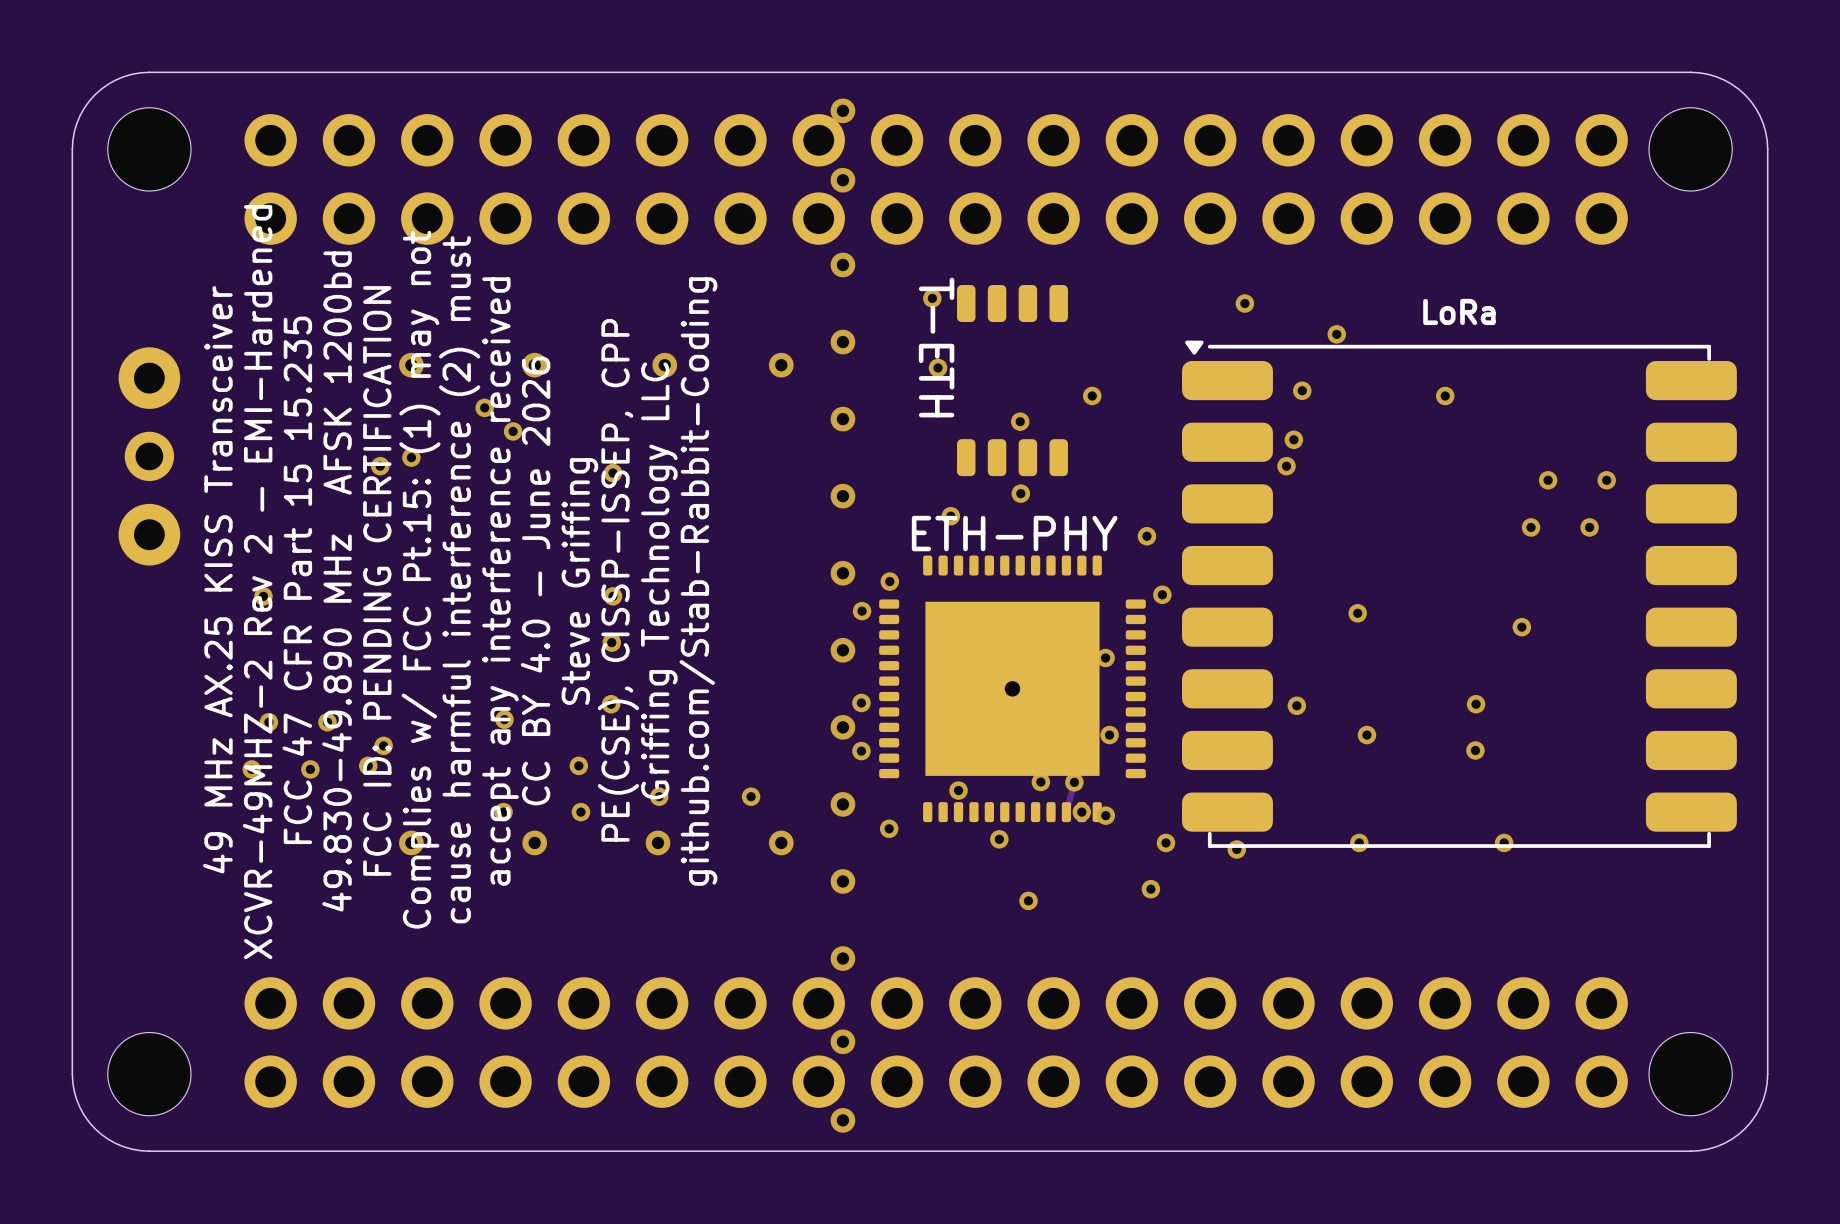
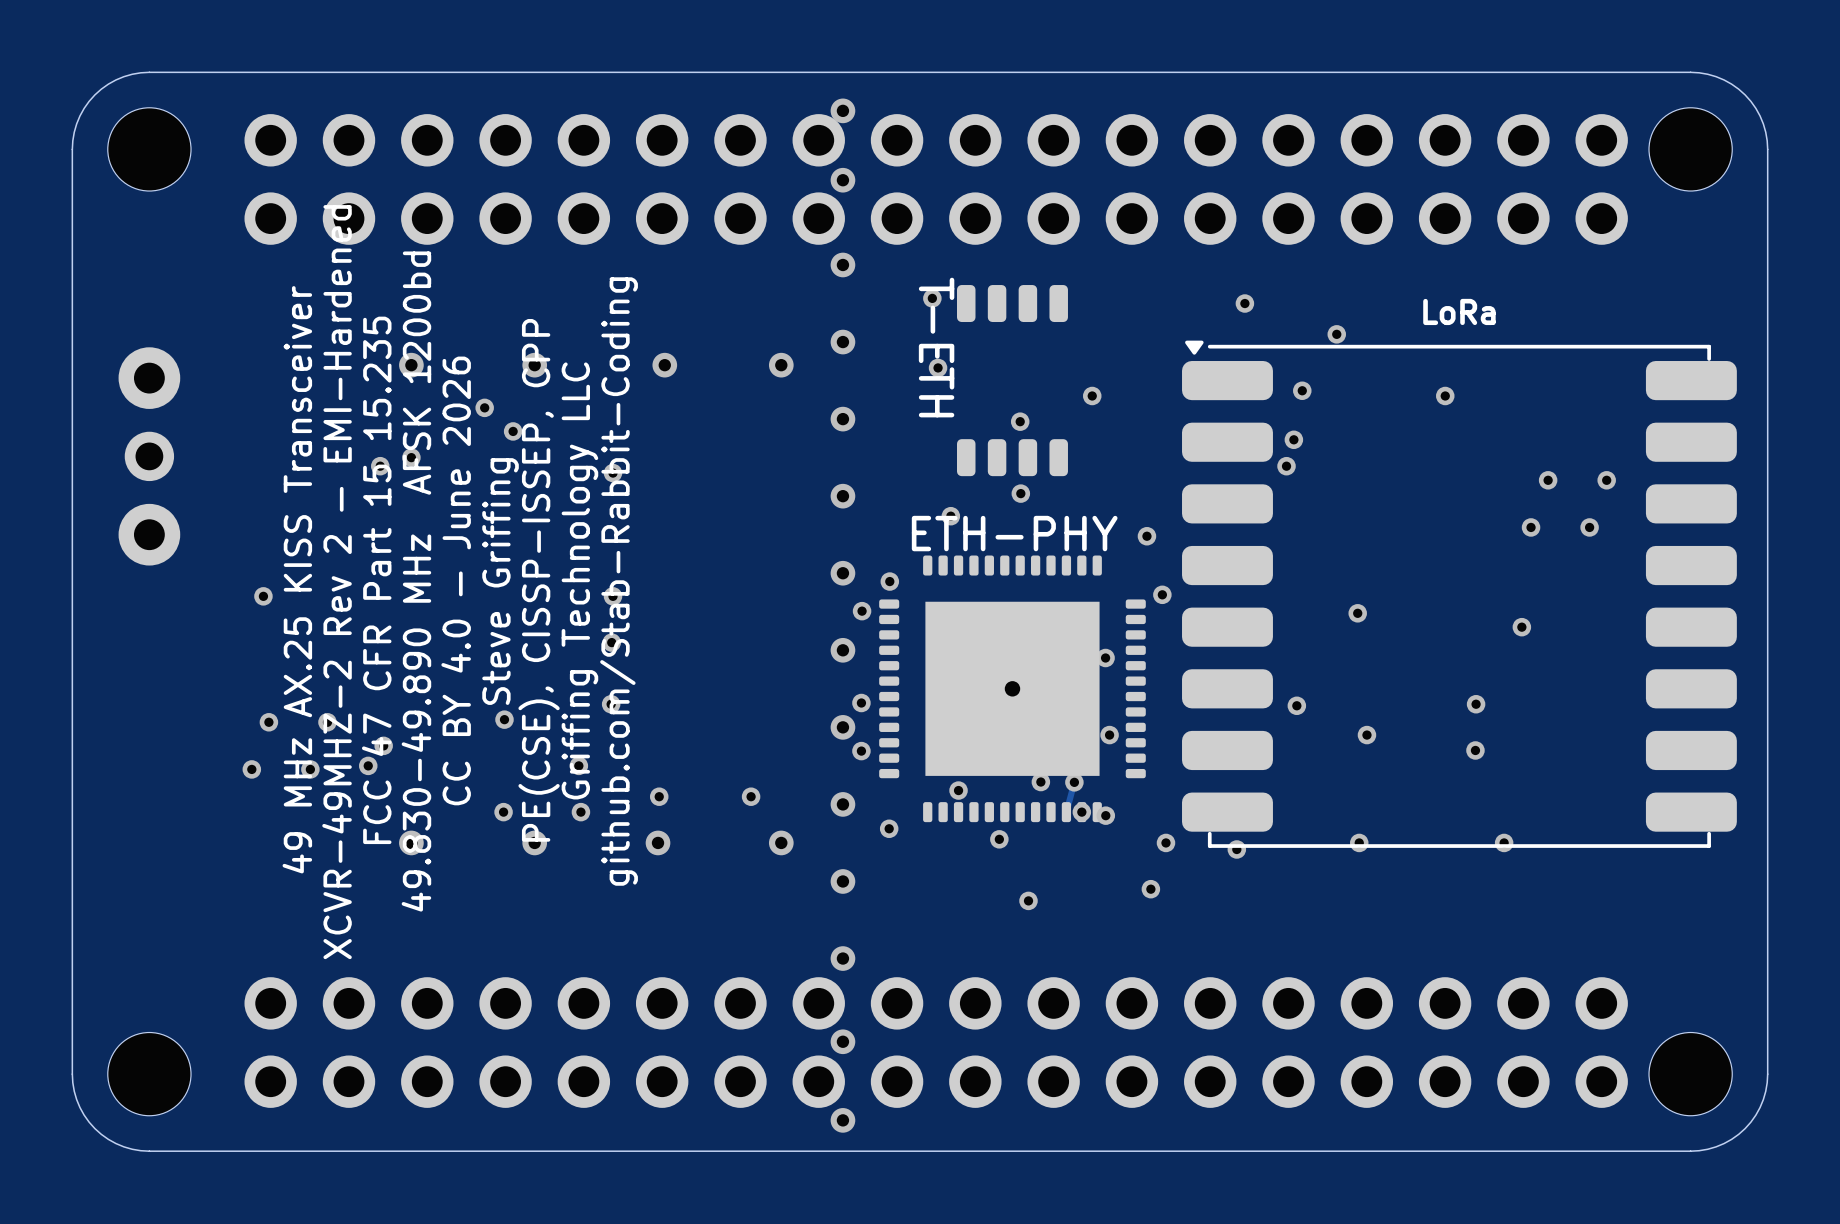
text: 49 MHz AX.25 KISS Transceiver (217, 579) -> none
text: Complies w/ FCC Pt.15: (1) may not (419, 579) -> 49.830-49.890 MHz AFSK 1200bd (416, 581)
text: cause harmful interference (2) must (459, 579) -> CC BY 4.0 — June 2026 (456, 580)
text: FCC 47 CFR Part 15 15.235 (297, 580) -> 49 MHz AX.25 KISS Transceiver (297, 579)
text: FCC ID: PENDING CERTIFICATION (377, 580) -> FCC 47 CFR Part 15 15.235 (376, 580)
text: CC BY 4.0 — June 2026 (535, 580) -> PE(CSE), CISSP-ISSEP, CPP (539, 580)
text: PE(CSE), CISSP-ISSEP, CPP (618, 580) -> github.com/Stab-Rabbit-Coding (619, 581)
text: Griffing Technology LLC (659, 580) -> none
text: 49.830-49.890 MHz AFSK 1200bd (337, 581) -> XCVR-49MHZ-2 Rev 2 — EMI-Hardened (337, 582)
text: accept any interference received (500, 581) -> Steve Griffing (500, 581)
text: Steve Griffing (579, 581) -> Griffing Technology LLC (579, 580)
text: github.com/Stab-Rabbit-Coding (698, 581) -> none
text: XCVR-49MHZ-2 Rev 2 — EMI-Hardened (257, 582) -> none

